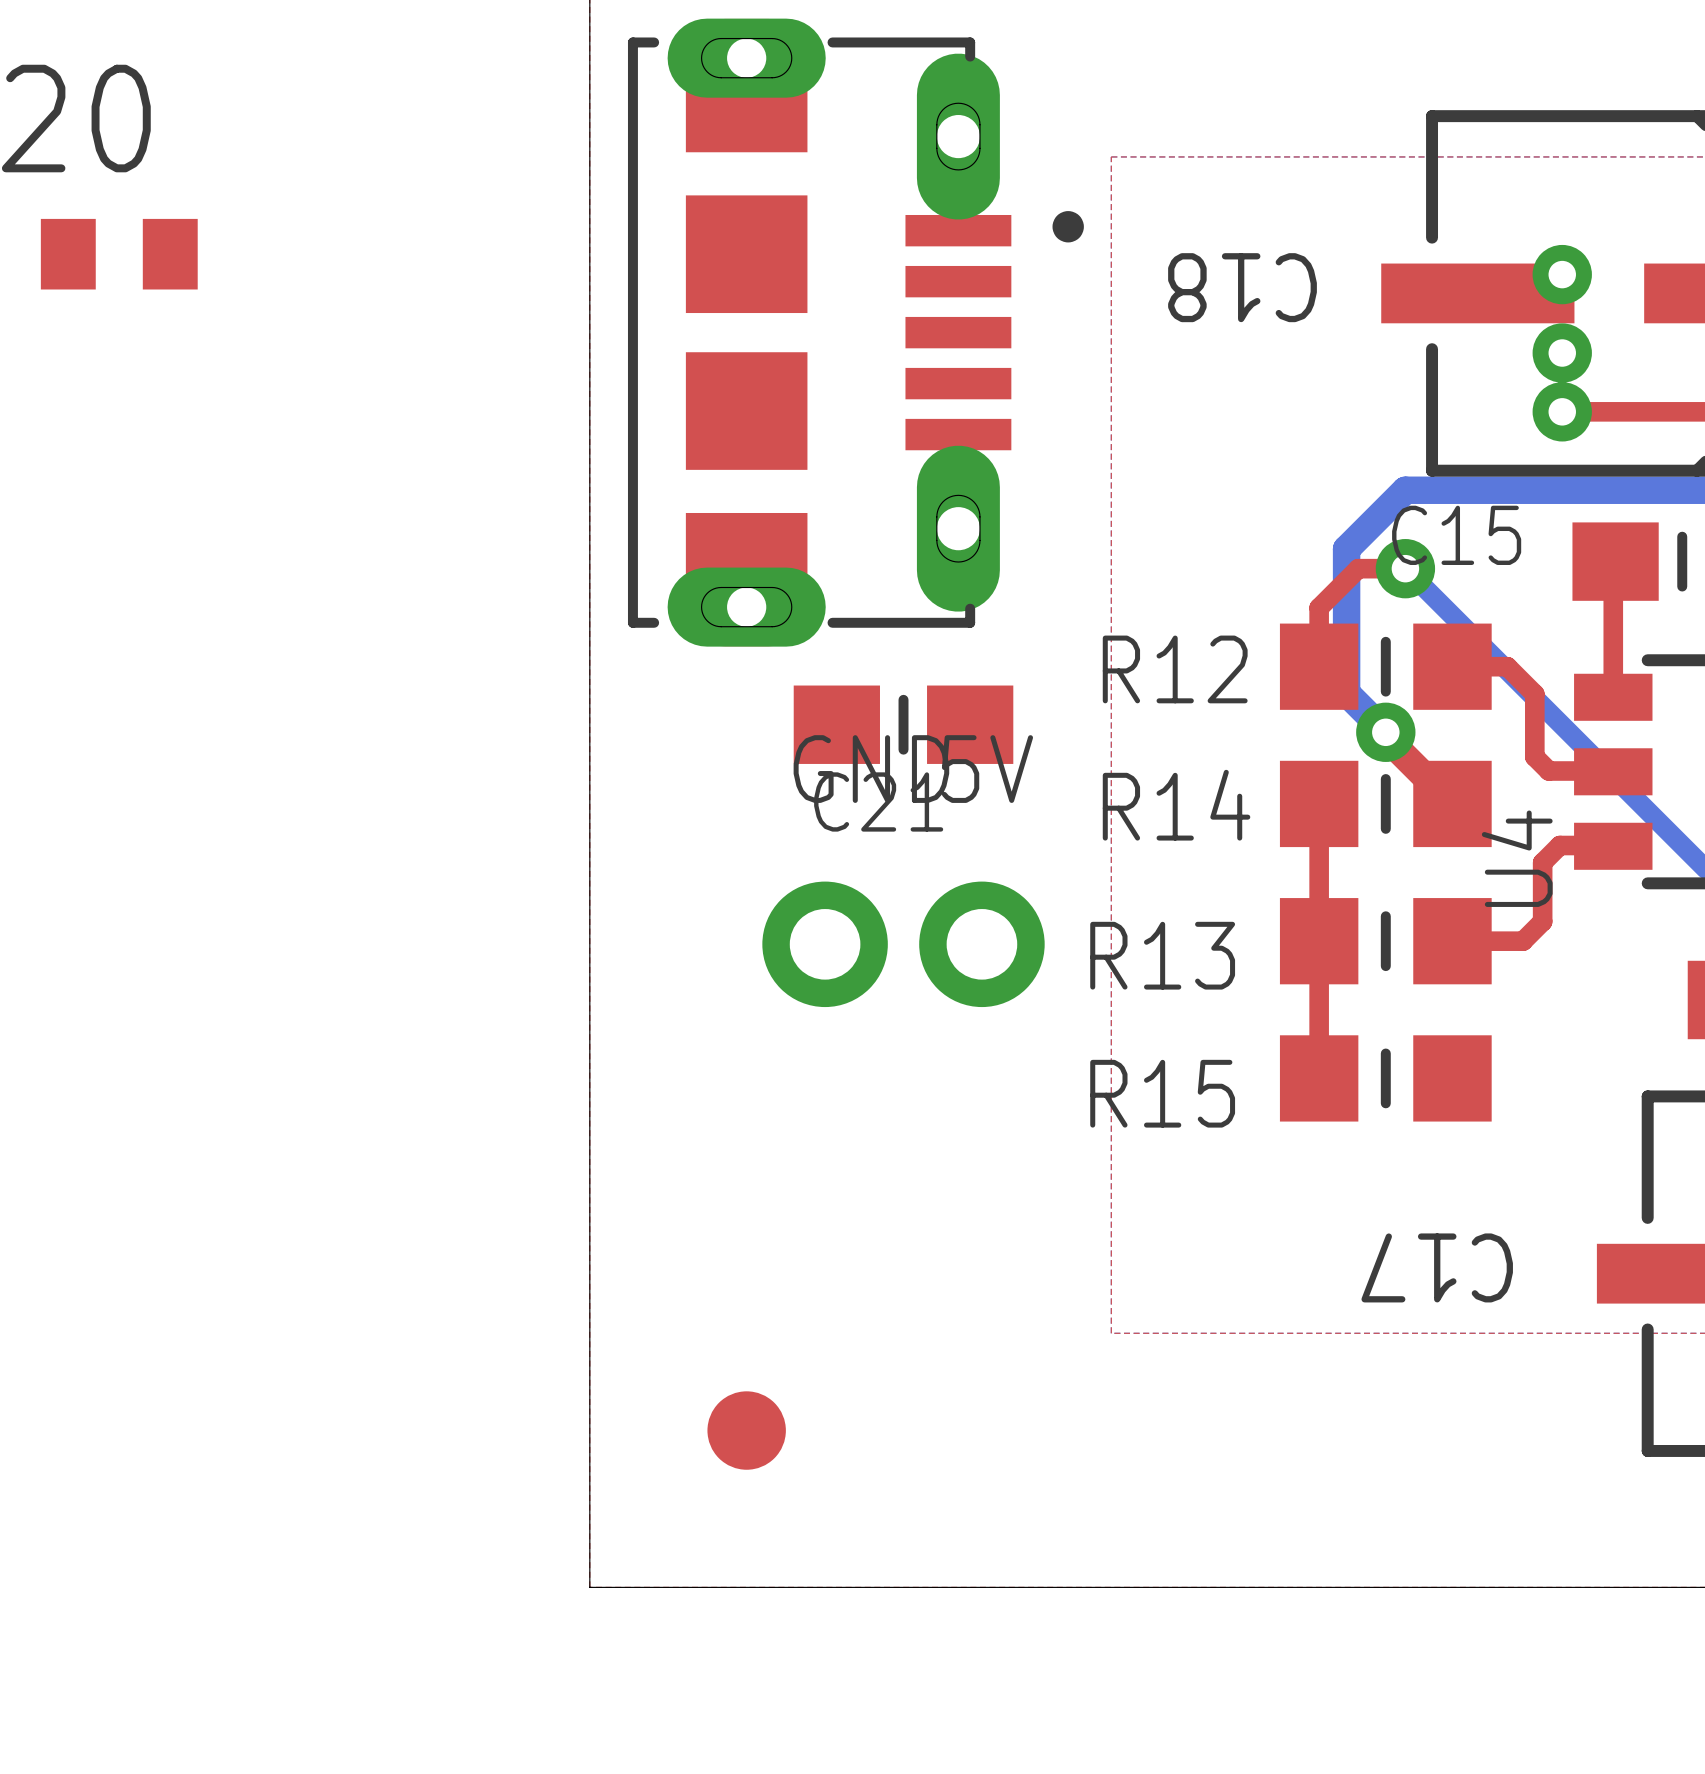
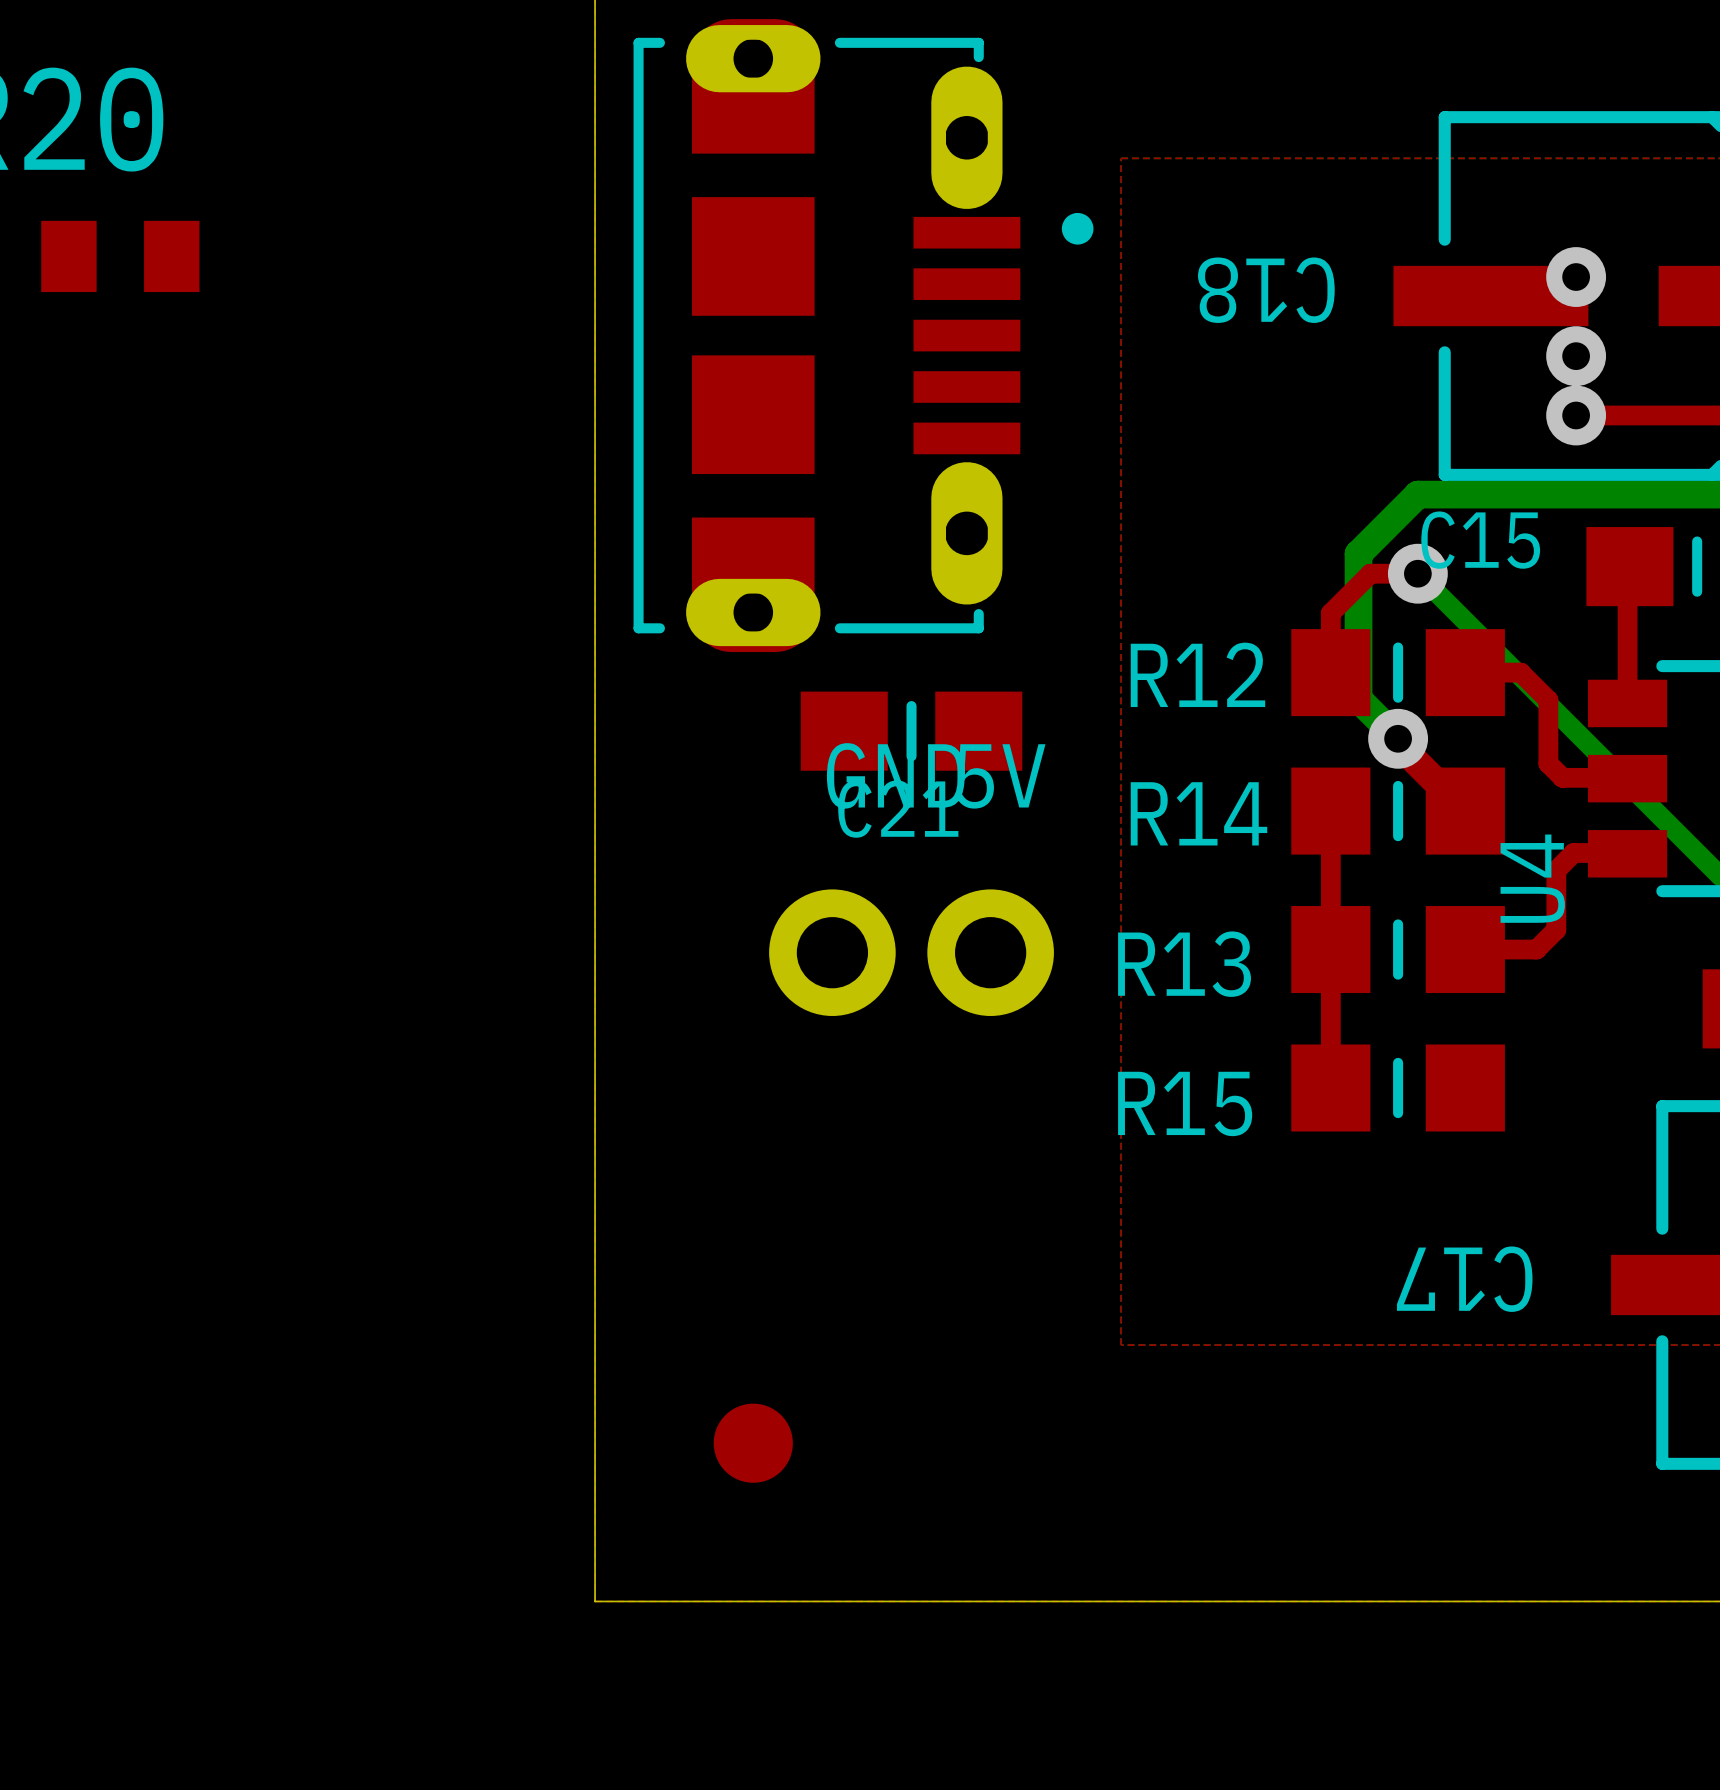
part footprint: [627, 18, 1084, 647] -> [633, 19, 1094, 653]

